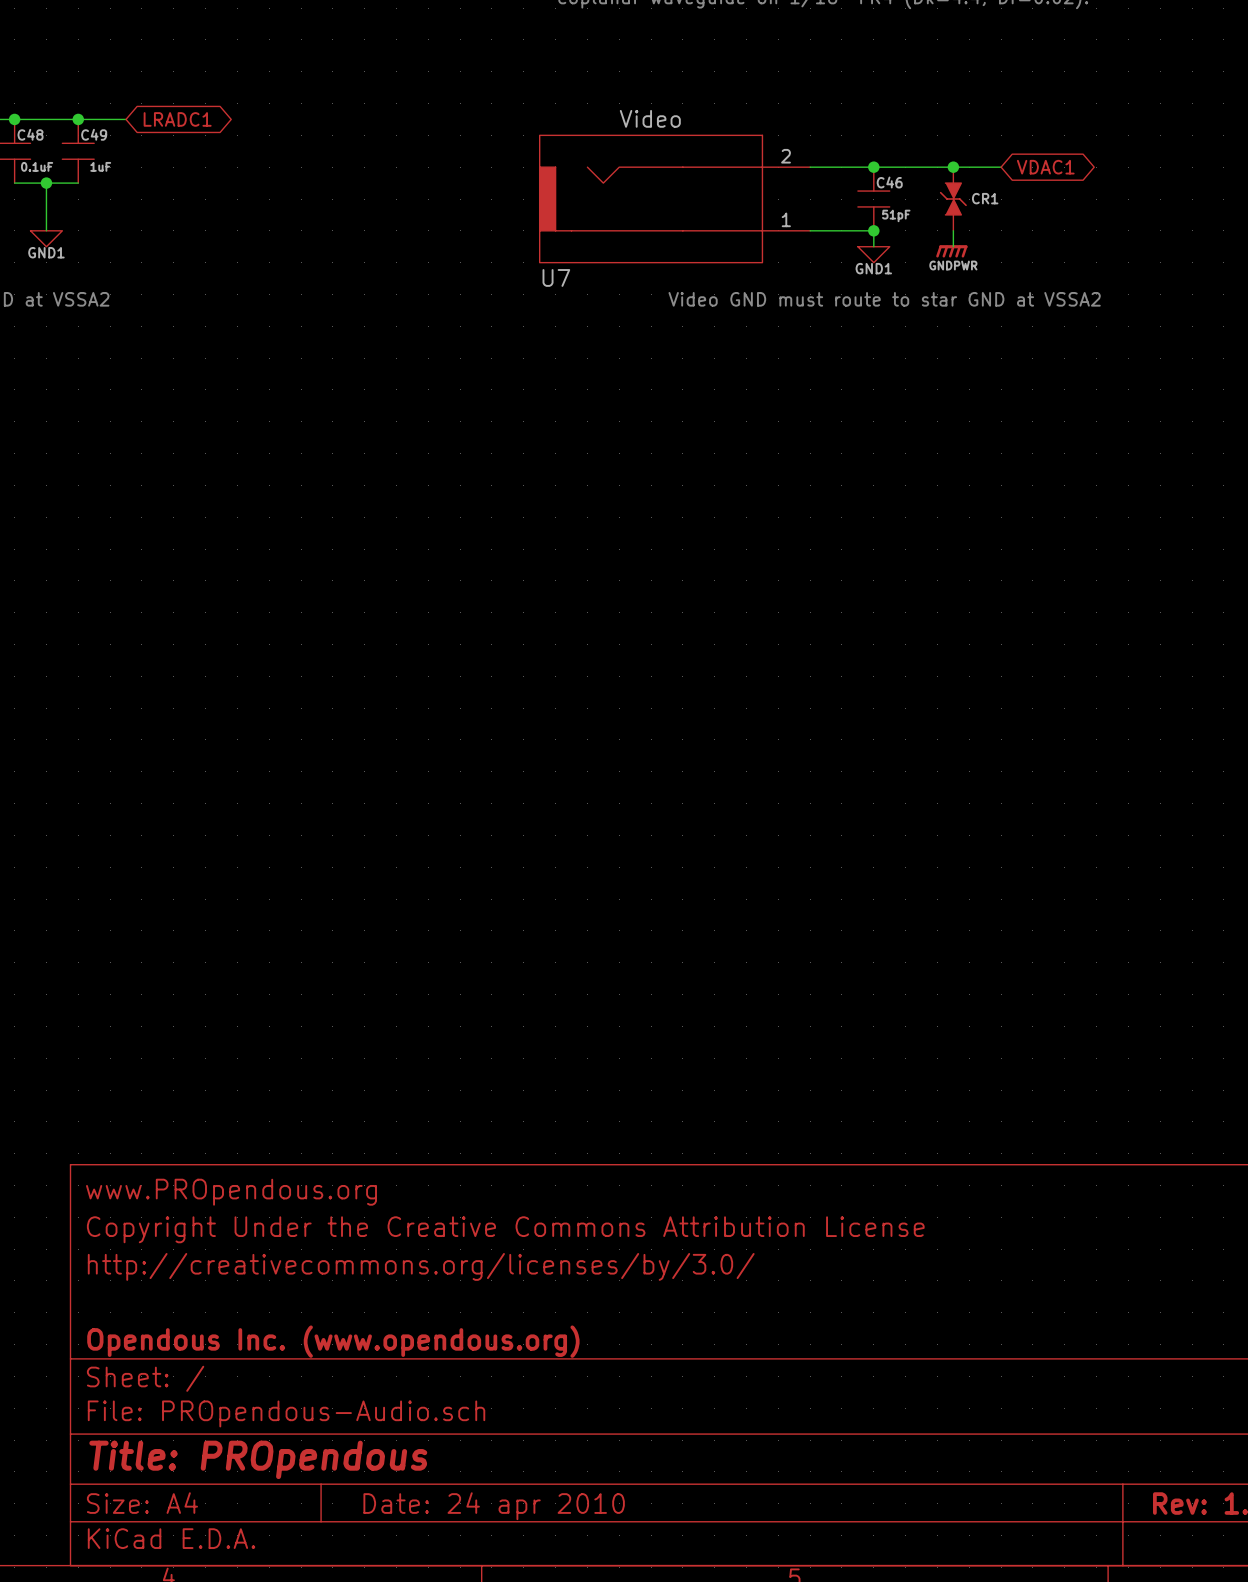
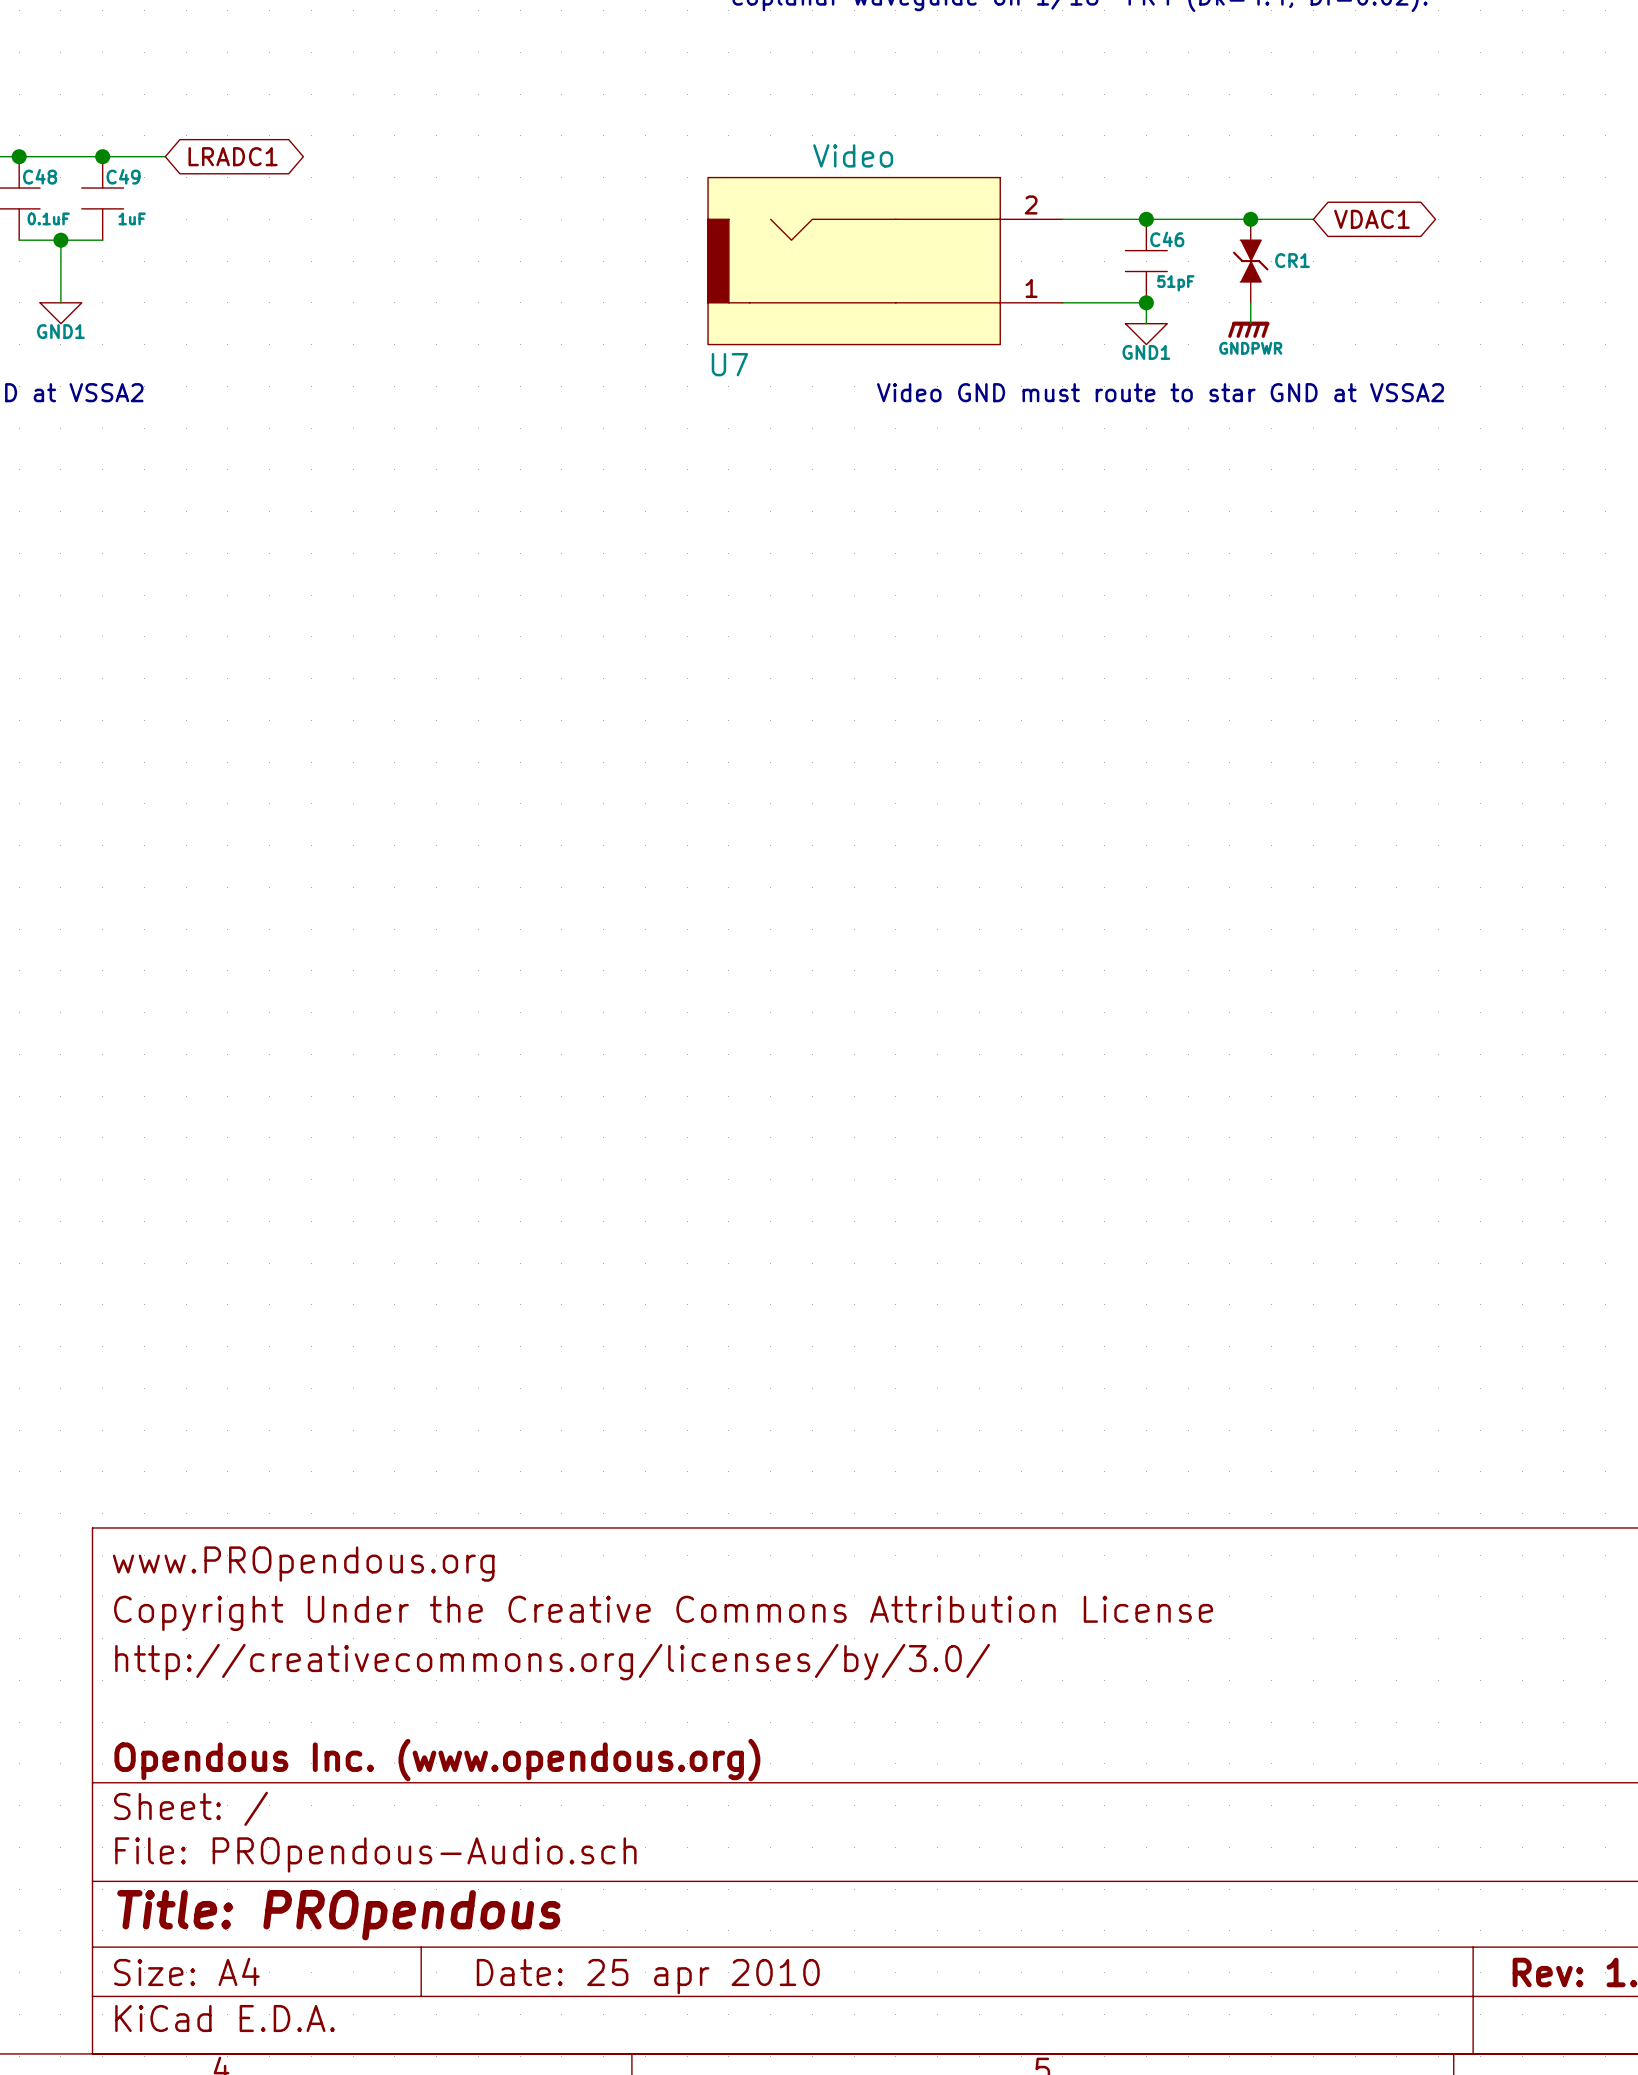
title block: Date: 24 apr 2010 (494, 1506) -> Date: 25 apr 2010 (648, 1976)

